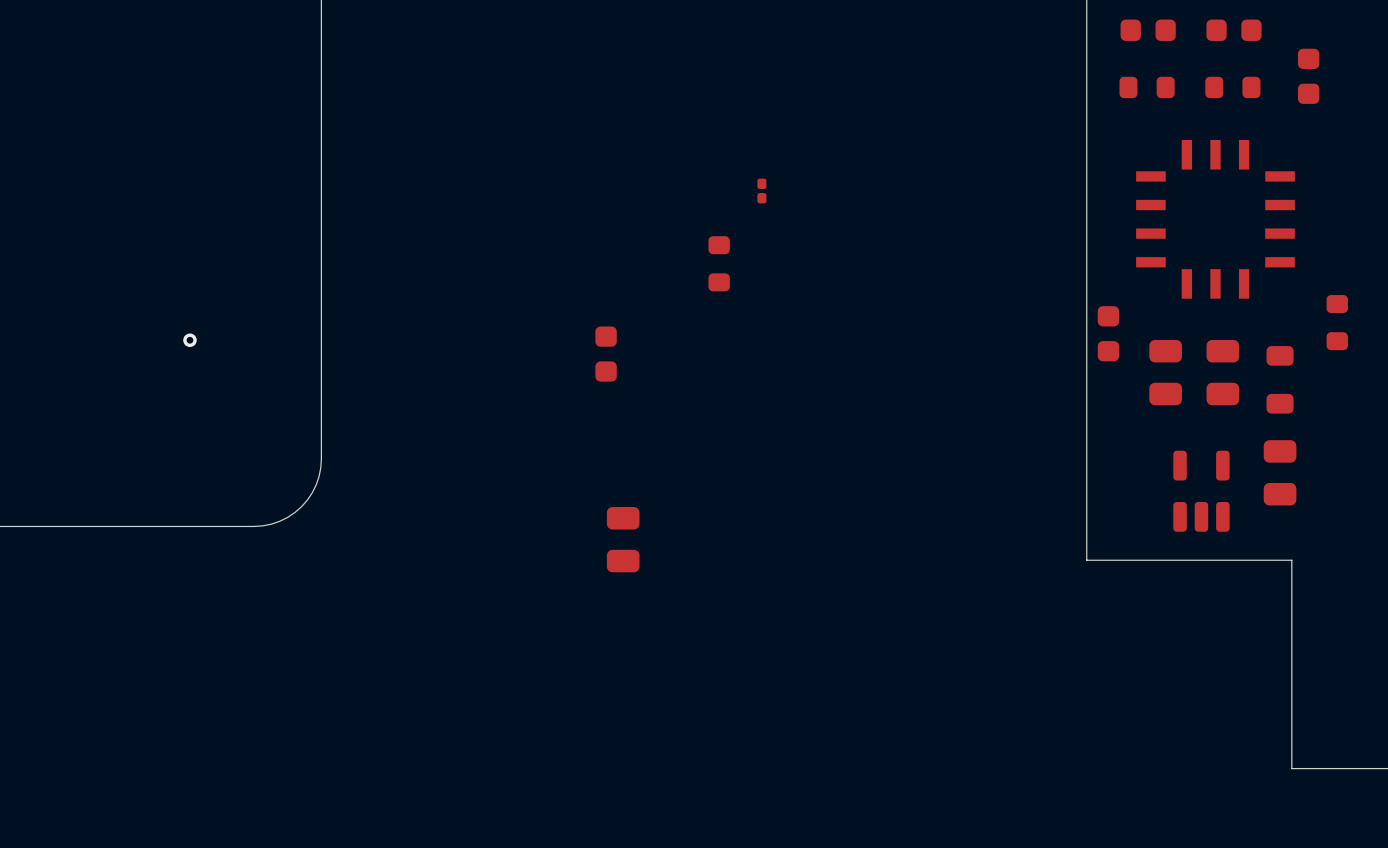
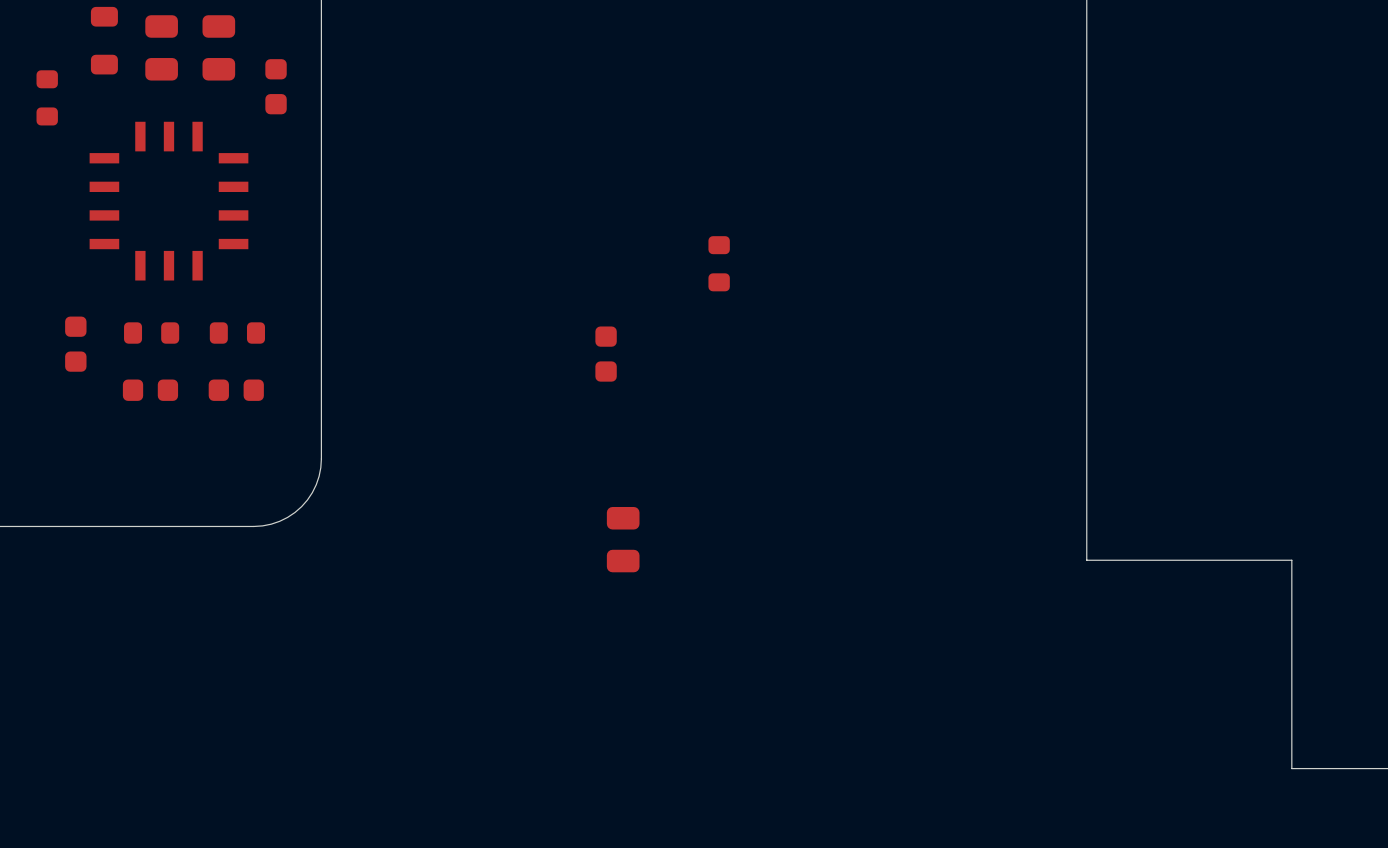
part: (1148, 30) -> none
part: (1233, 30) -> none
part: none -> (104, 40)
part: none -> (161, 47)
part: none -> (218, 47)
part: (1308, 76) -> none
part: none -> (276, 86)
part: (1147, 87) -> none
part: (1232, 87) -> none
part: none -> (47, 97)
part: (761, 191) -> none
part: none -> (168, 201)
part: (1215, 219) -> none
part: (1337, 322) -> none
part: none -> (151, 333)
part: none -> (237, 333)
part: (1108, 333) -> none
via: (189, 340) -> none
part: none -> (75, 344)
part: (1165, 372) -> none
part: (1222, 372) -> none
part: (1280, 379) -> none
part: none -> (150, 390)
part: none -> (236, 390)
part: (1280, 472) -> none
part: (1201, 491) -> none

